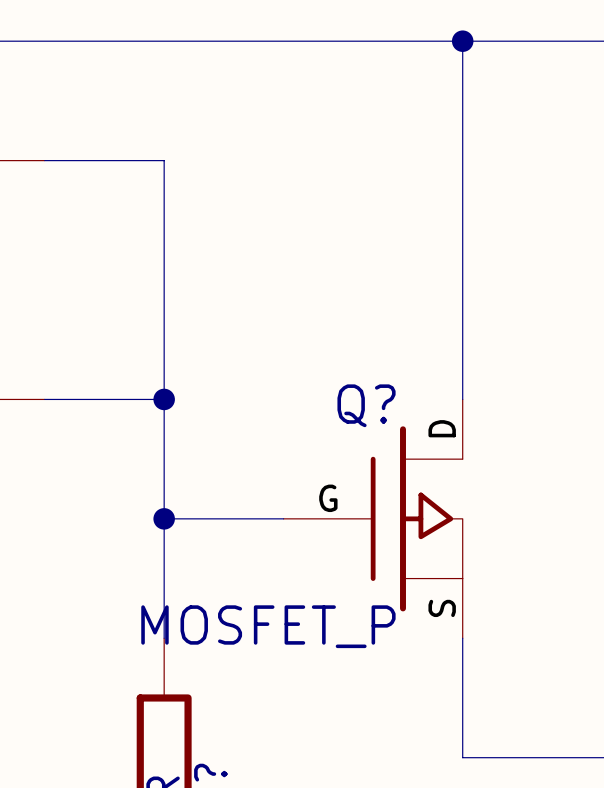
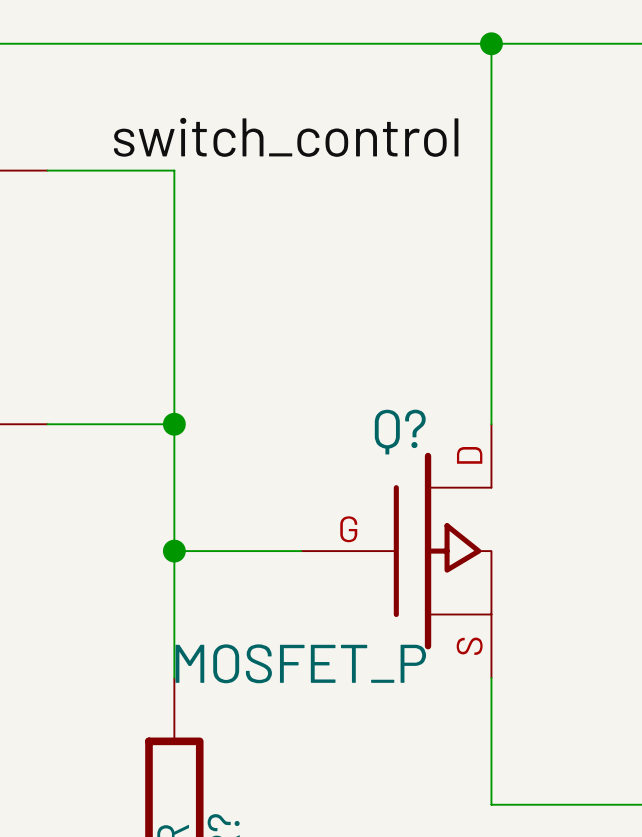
label: none -> switch_control (286, 137)

